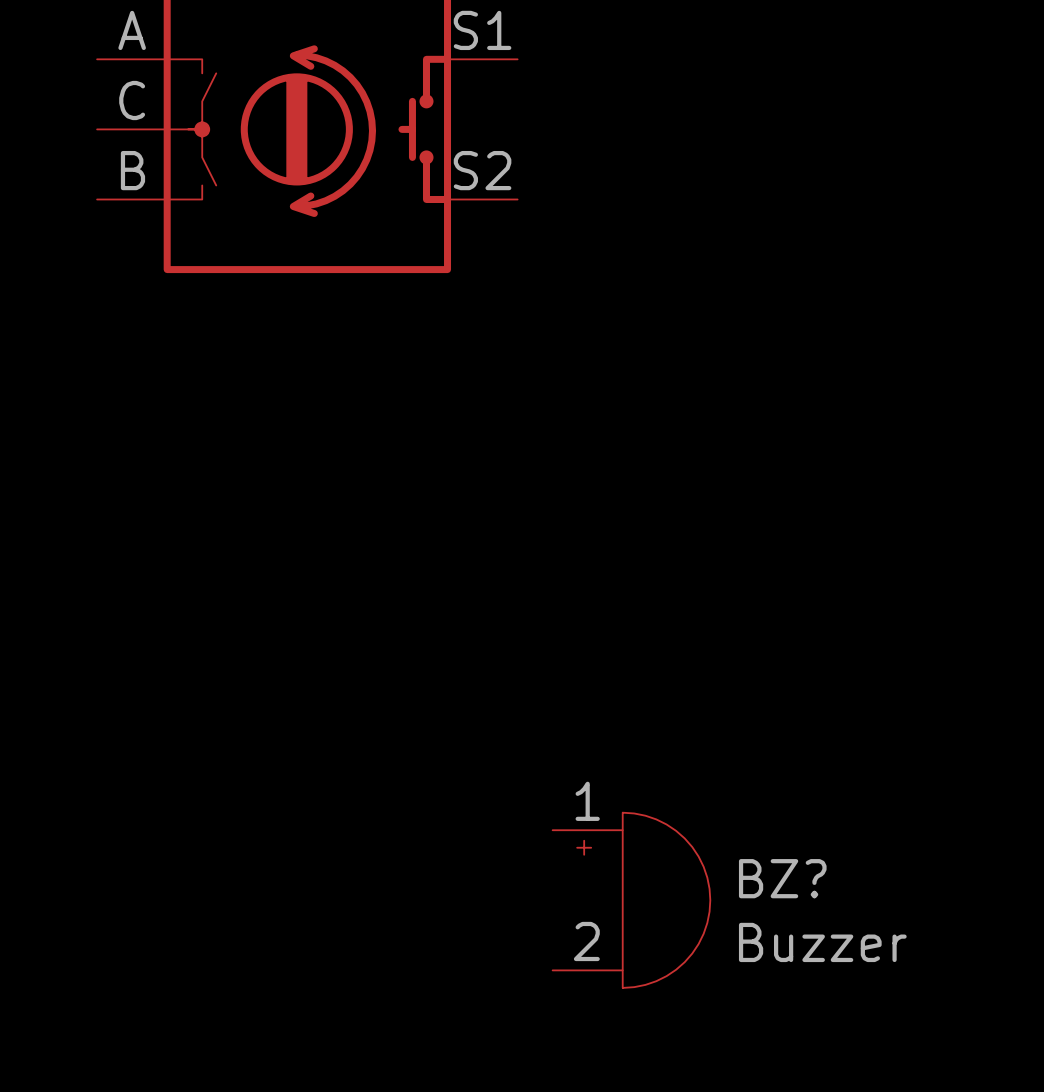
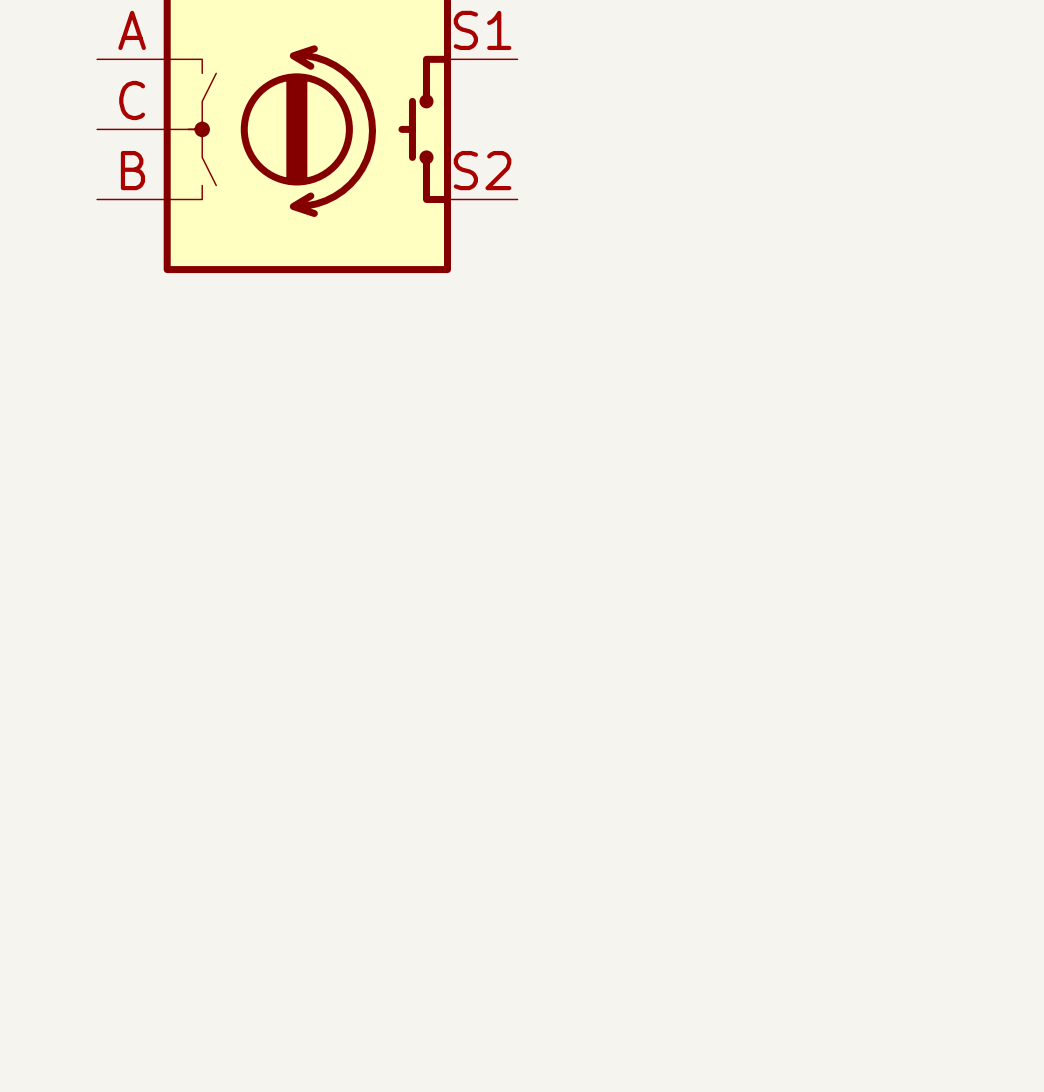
BZ?: Buzzer (631, 900) -> none

